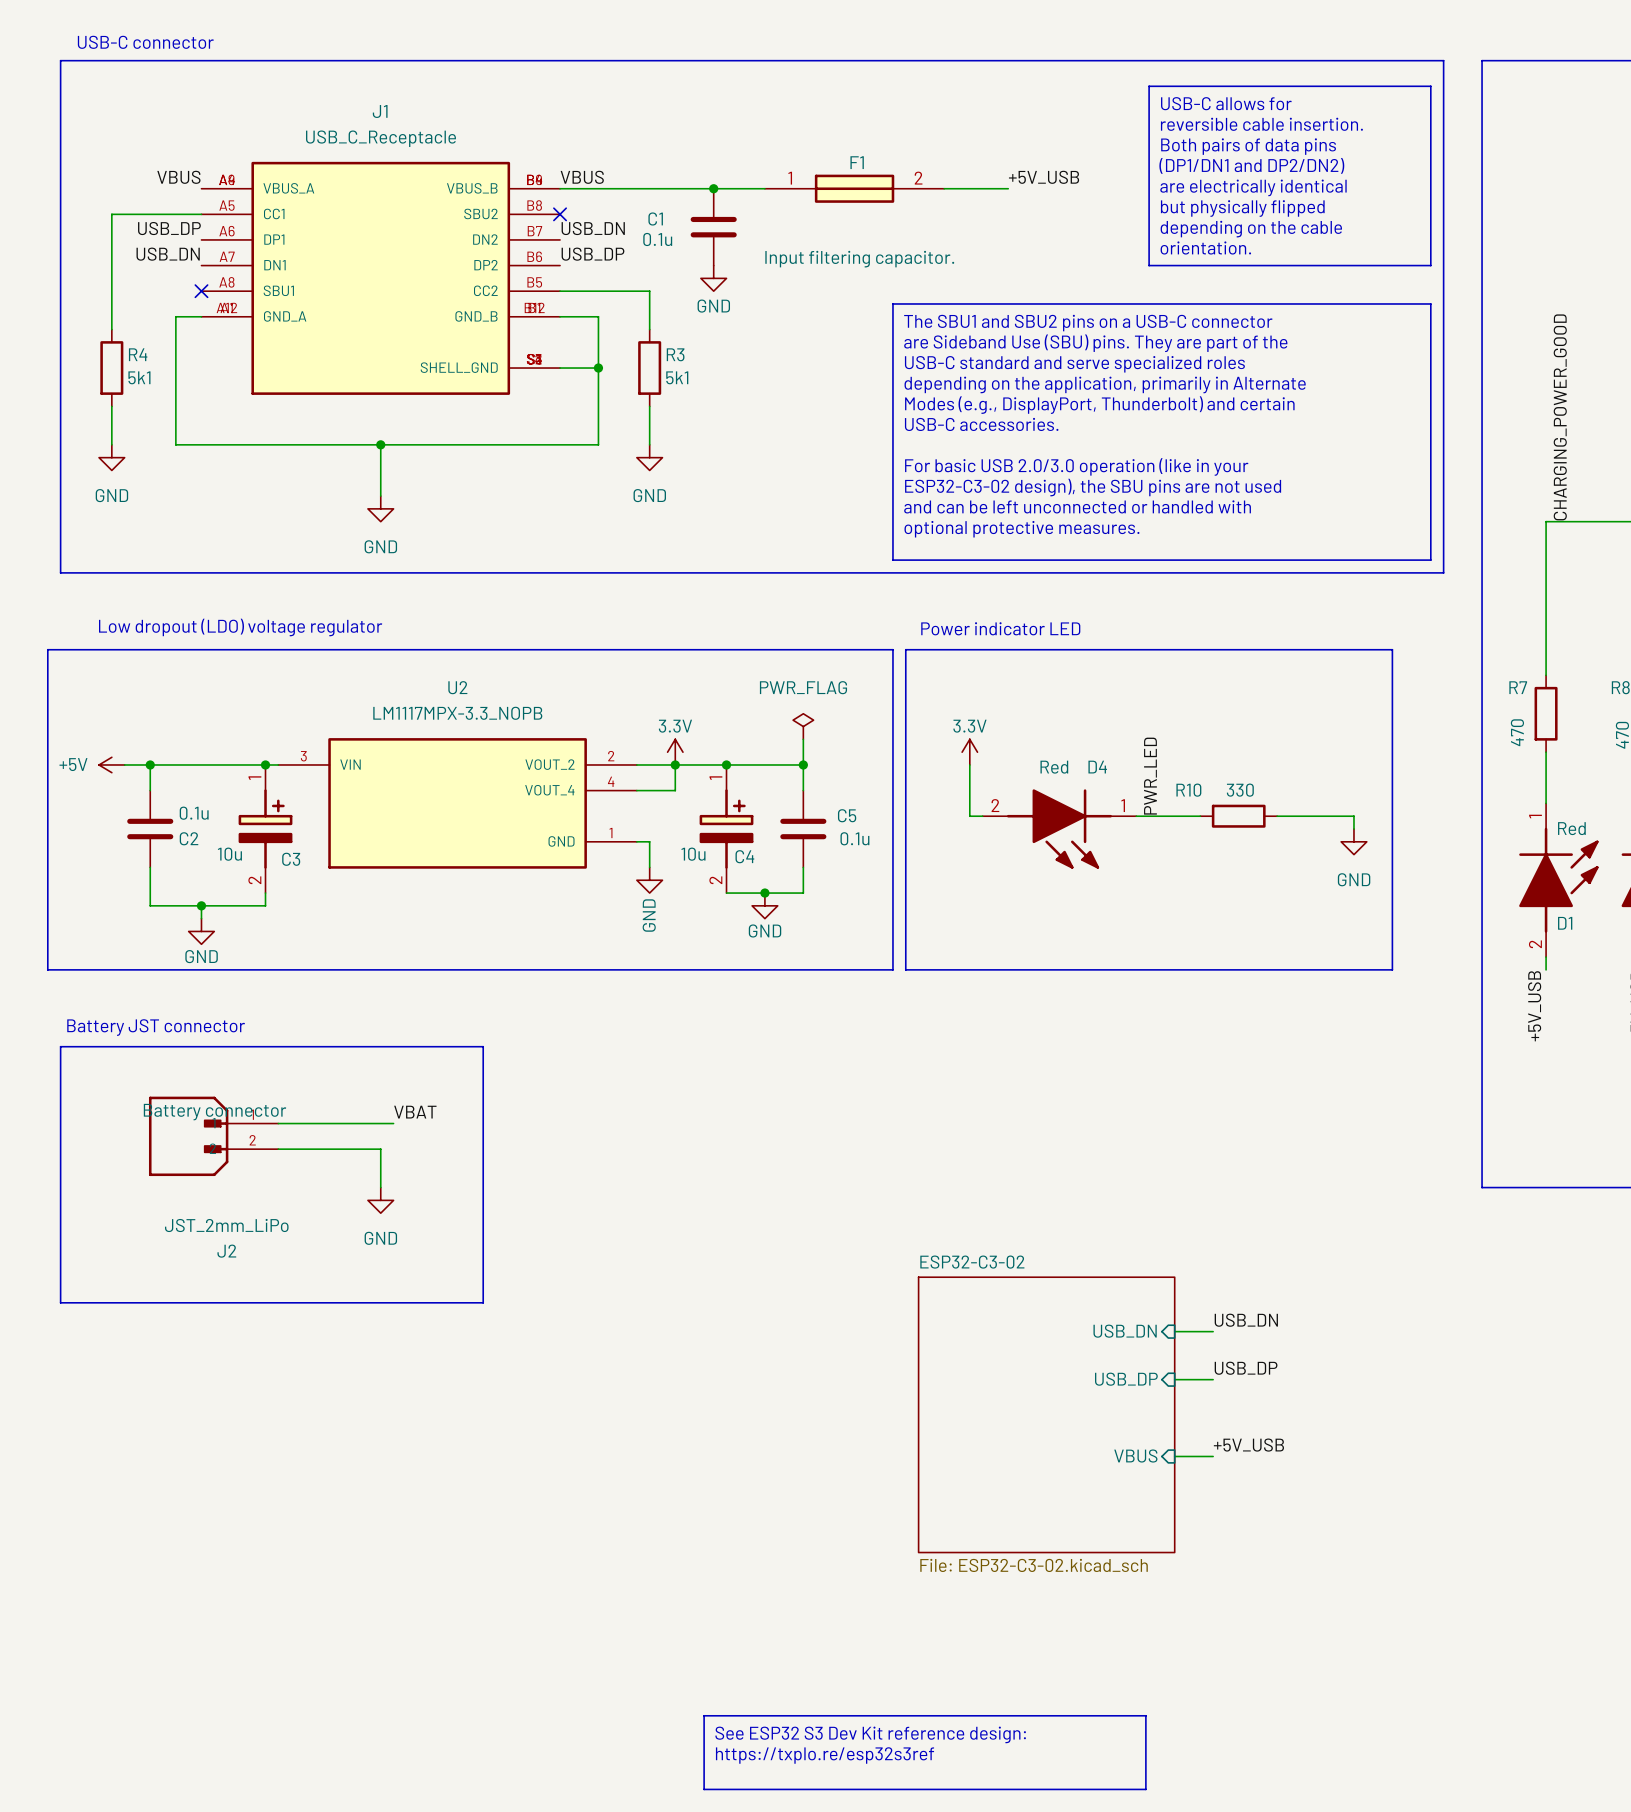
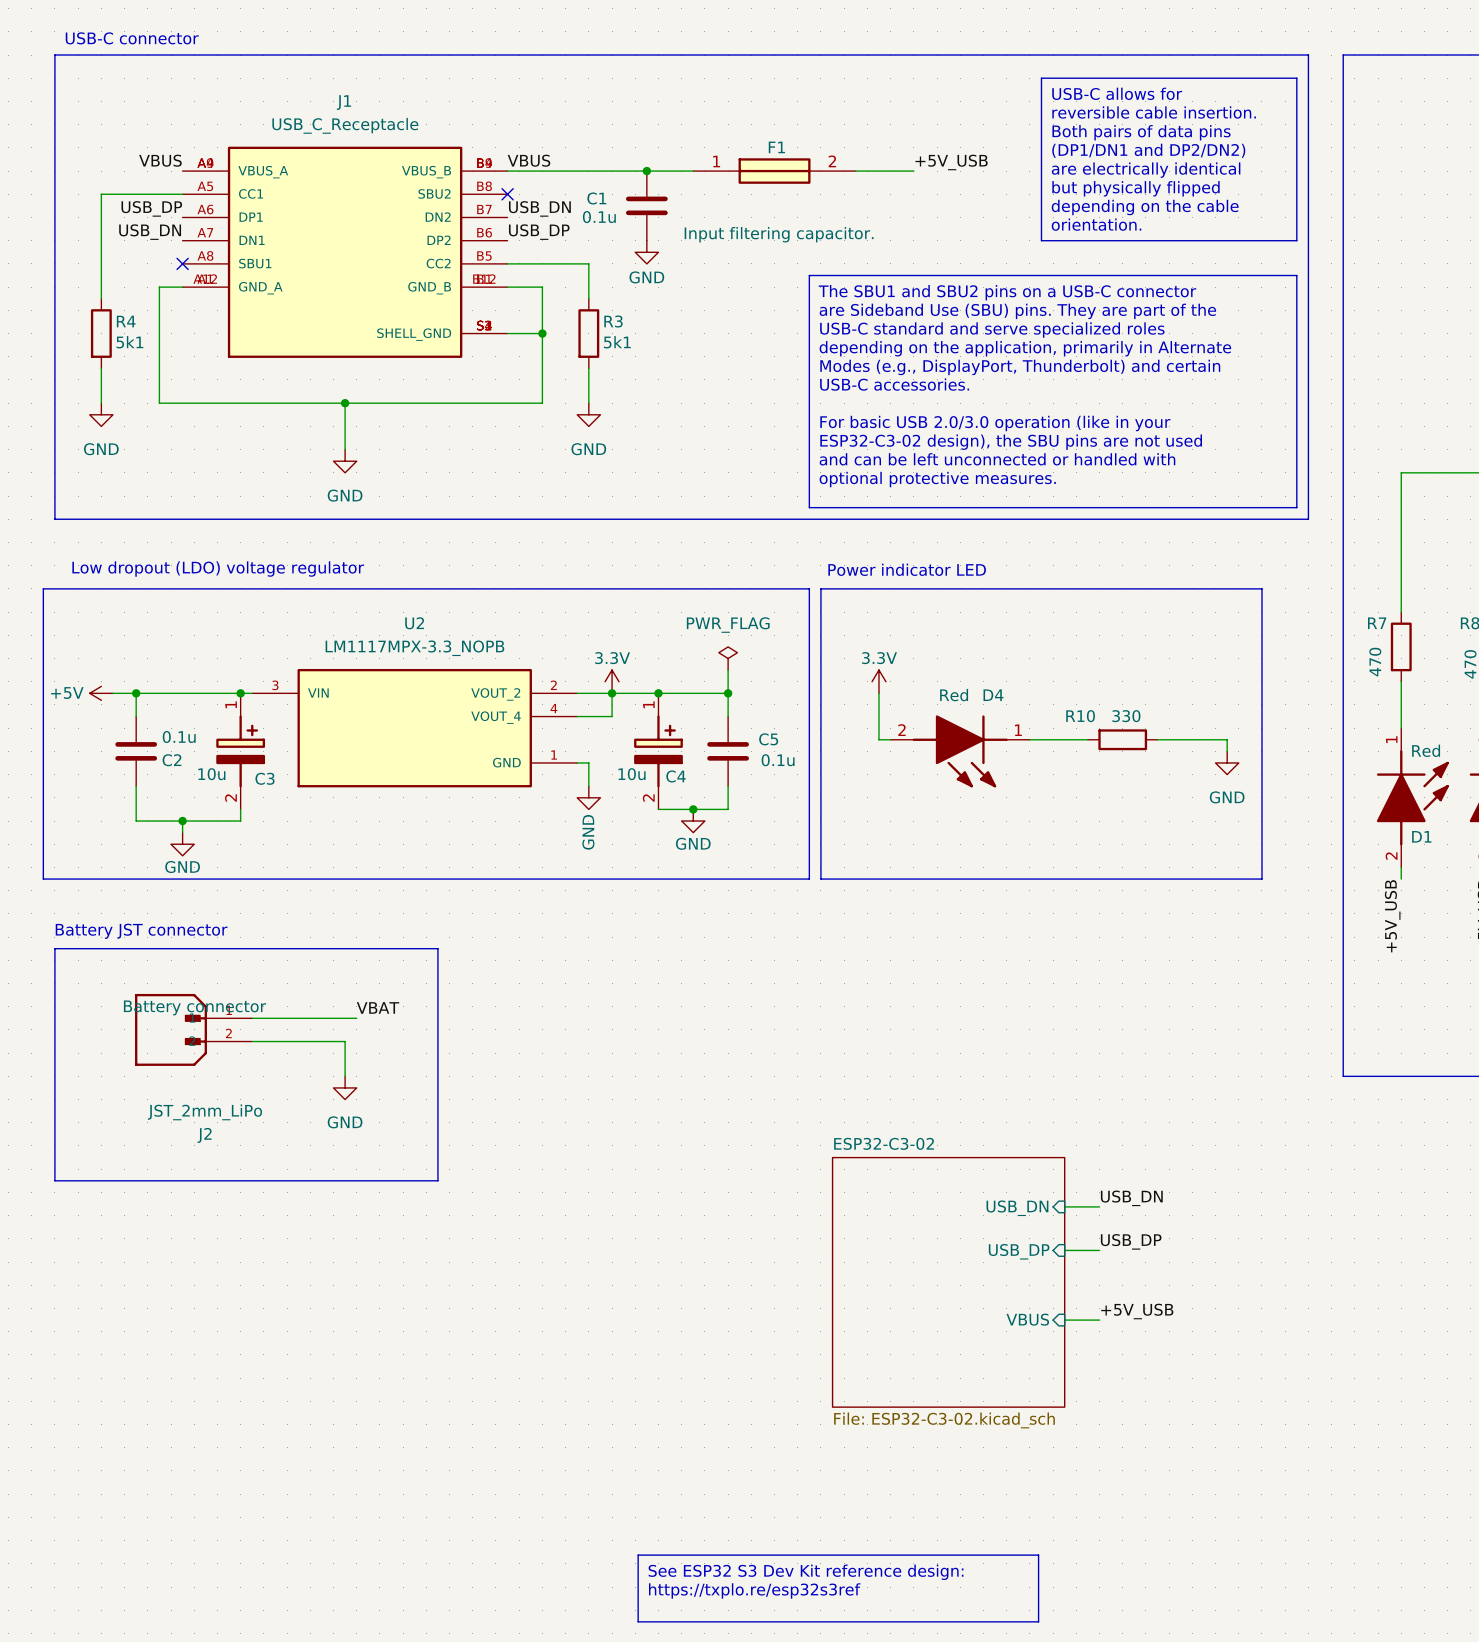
label: CHARGING_POWER_GOOD (1560, 417) -> none
label: PWR_LED (1150, 776) -> none

